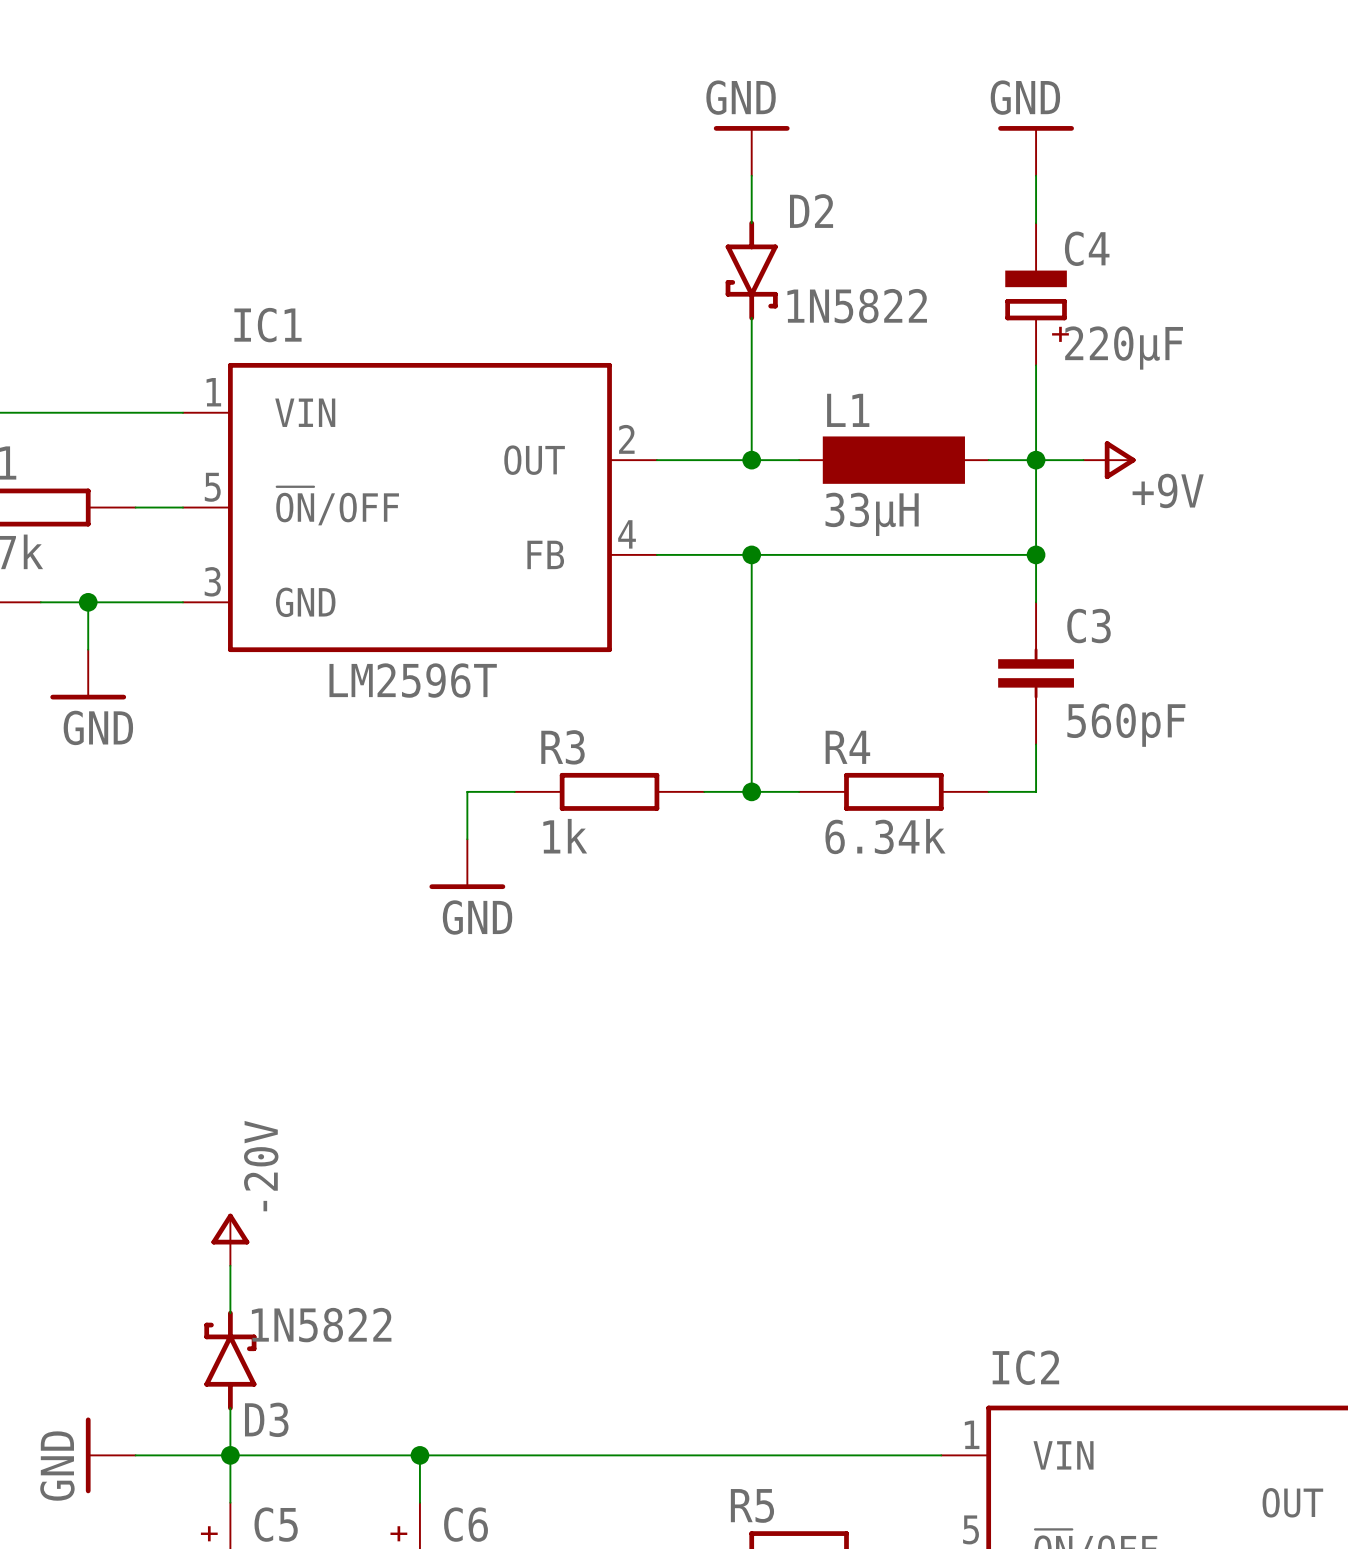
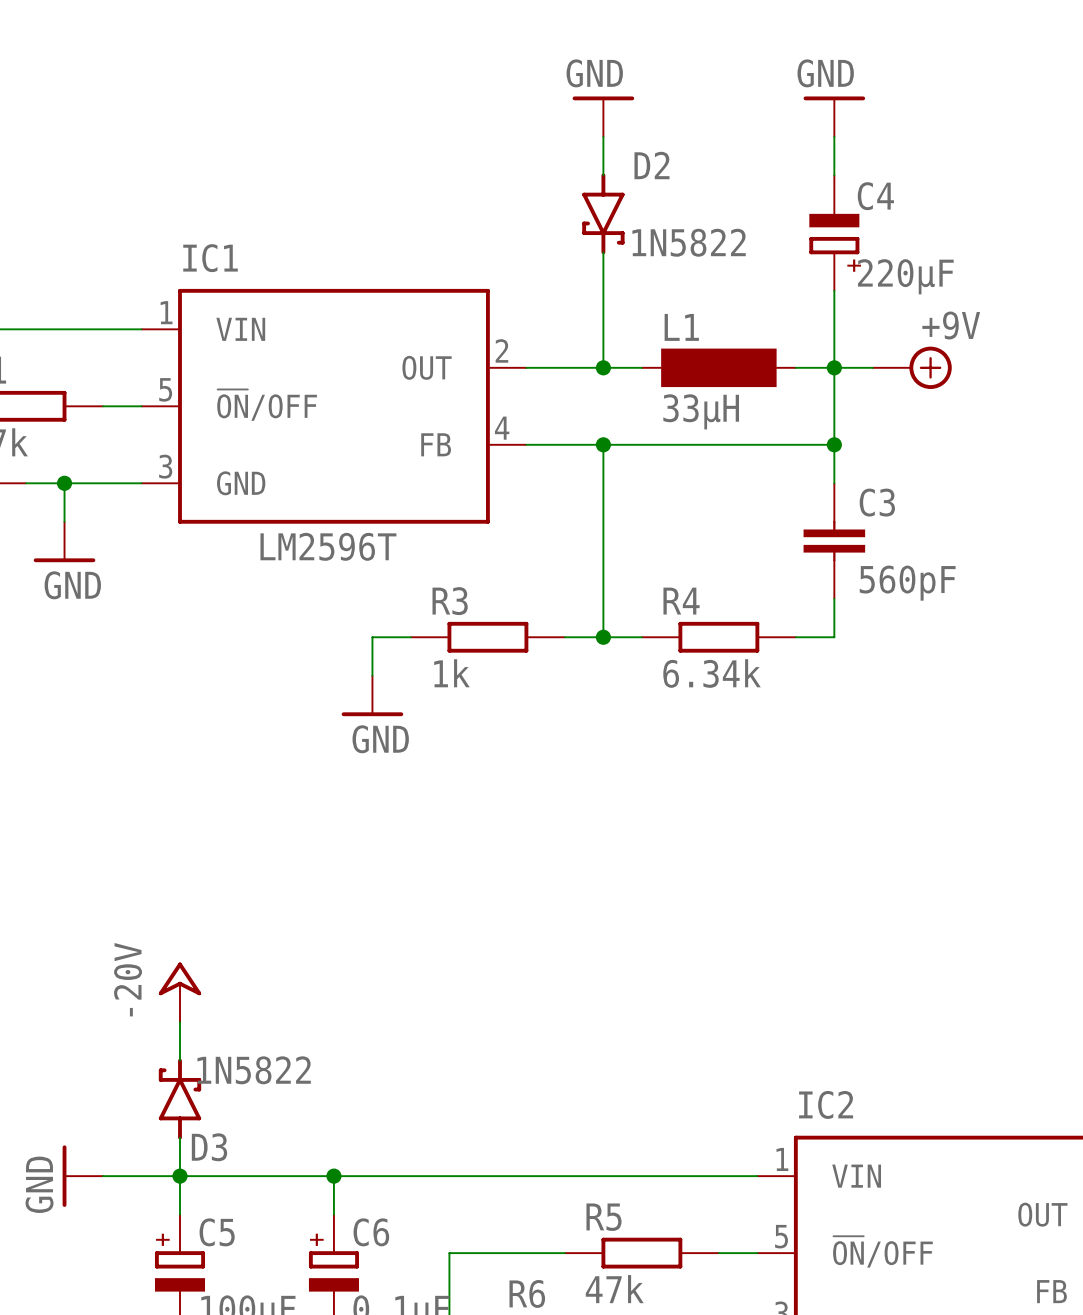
power symbol: +9V (1109, 460) -> none
power symbol: none -> +9V (912, 367)
power symbol text position: -20V (261, 1166) -> -20V (128, 979)
power symbol shape: [211, 1213, 250, 1266] -> [158, 962, 202, 1023]

